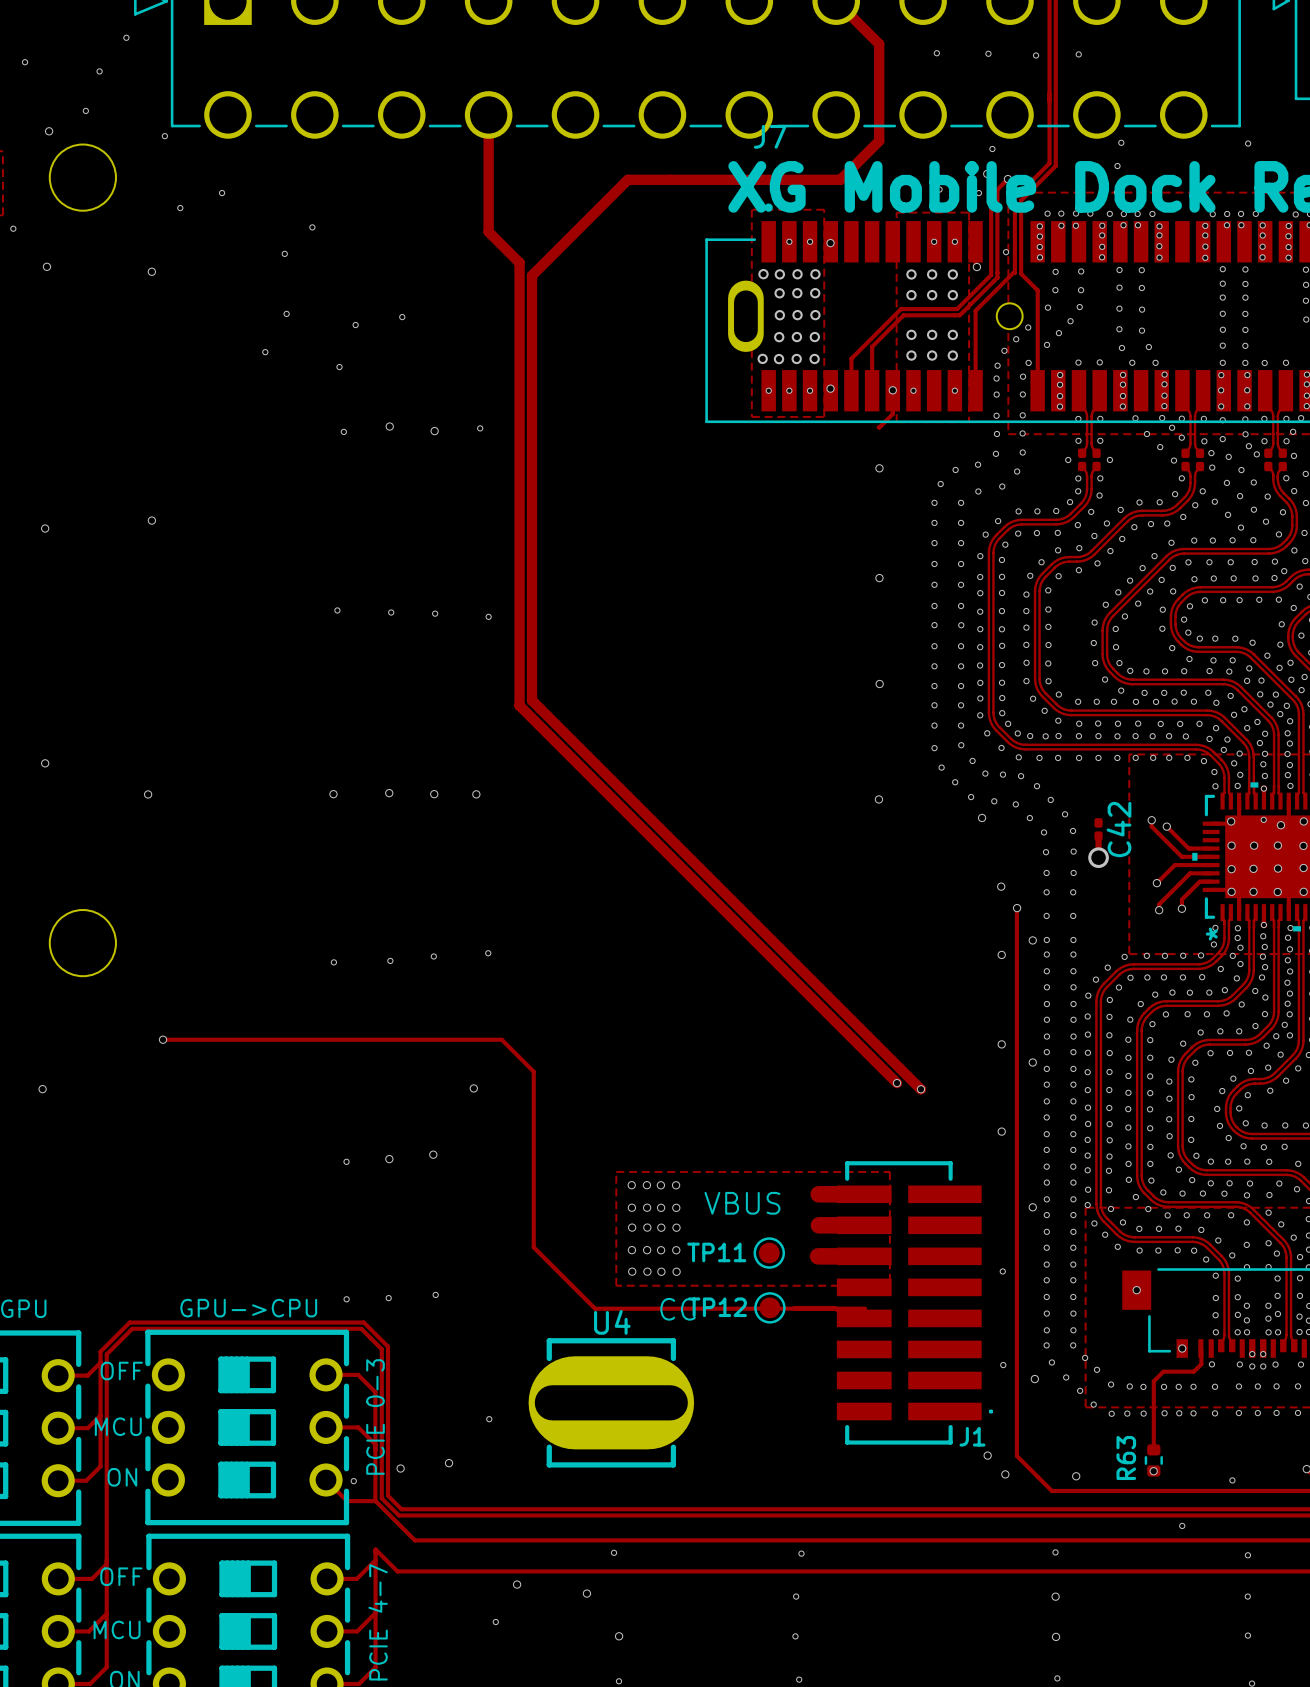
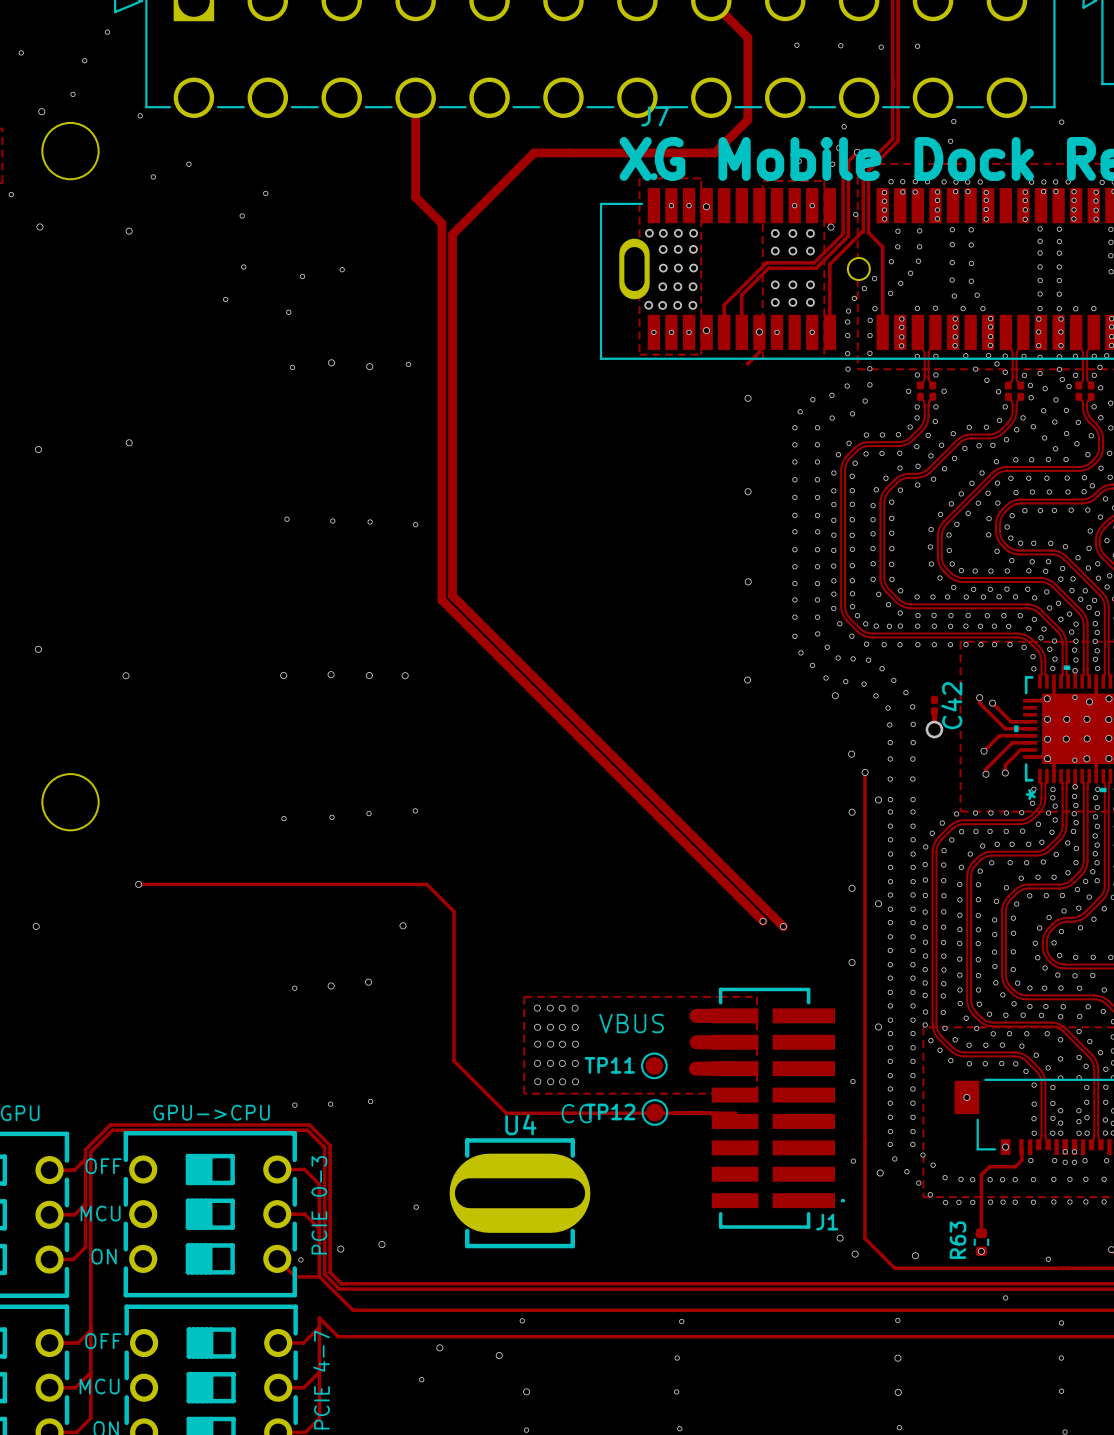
via: (1253, 891) -> none
via: none -> (1074, 760)

